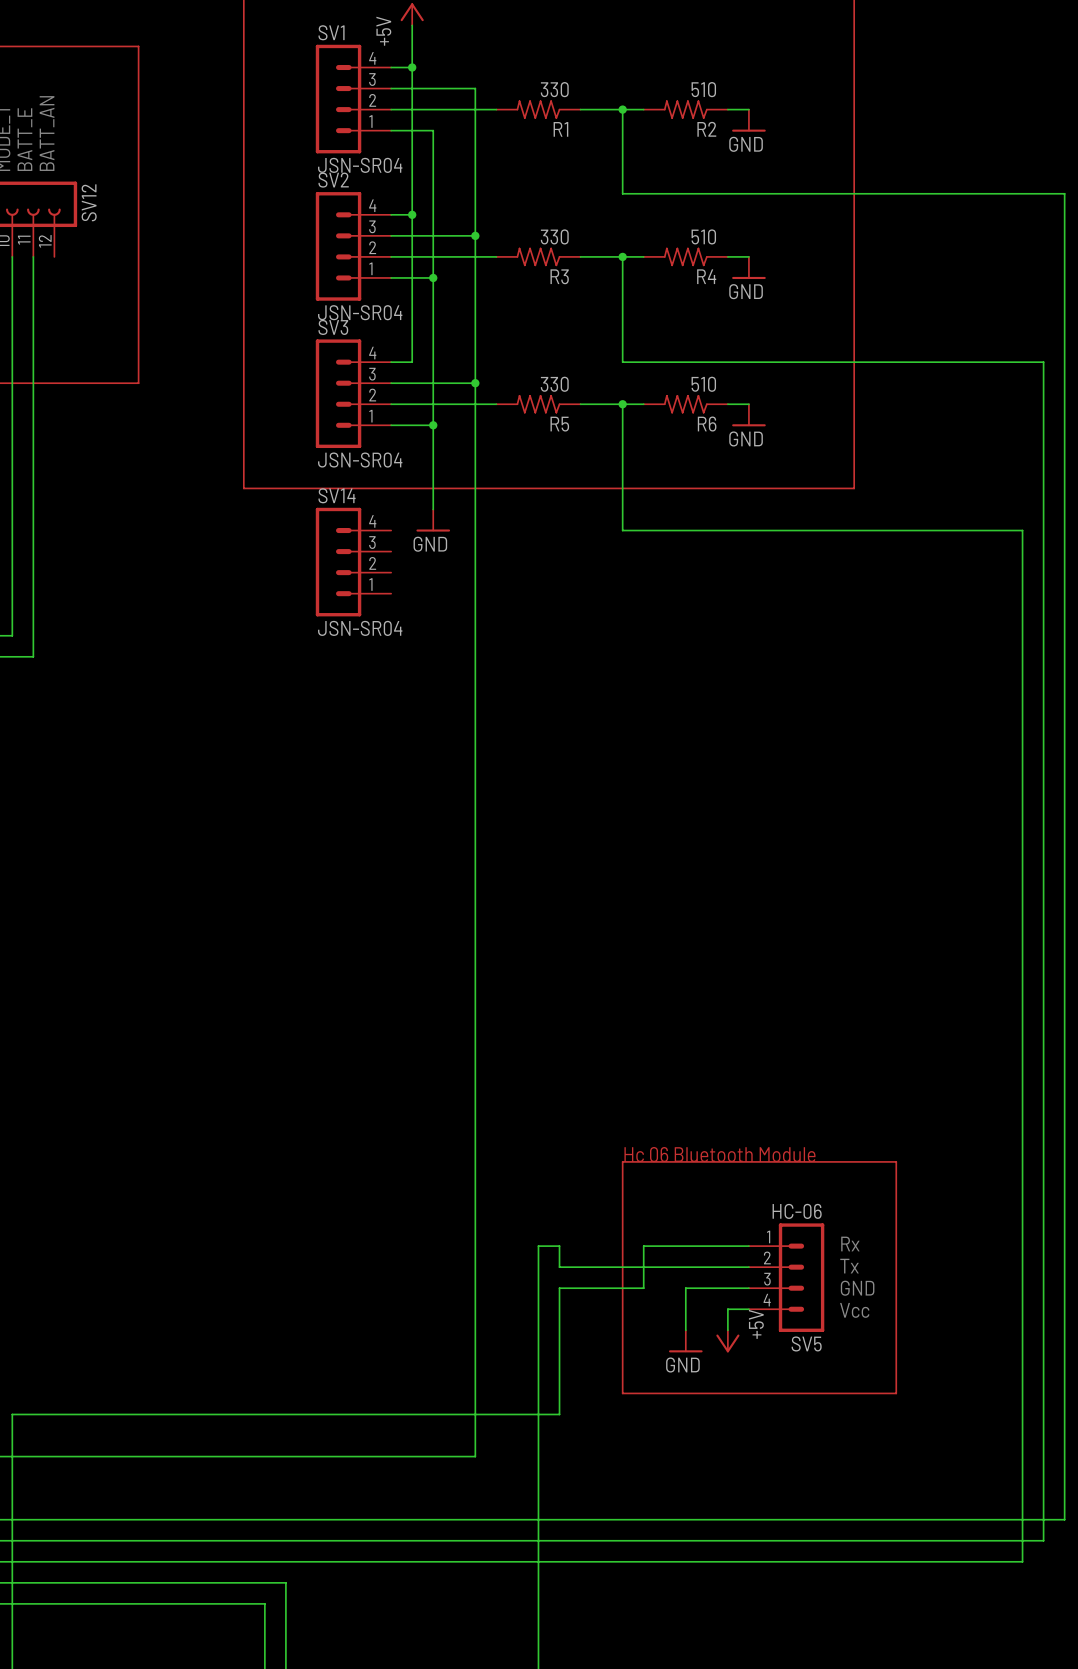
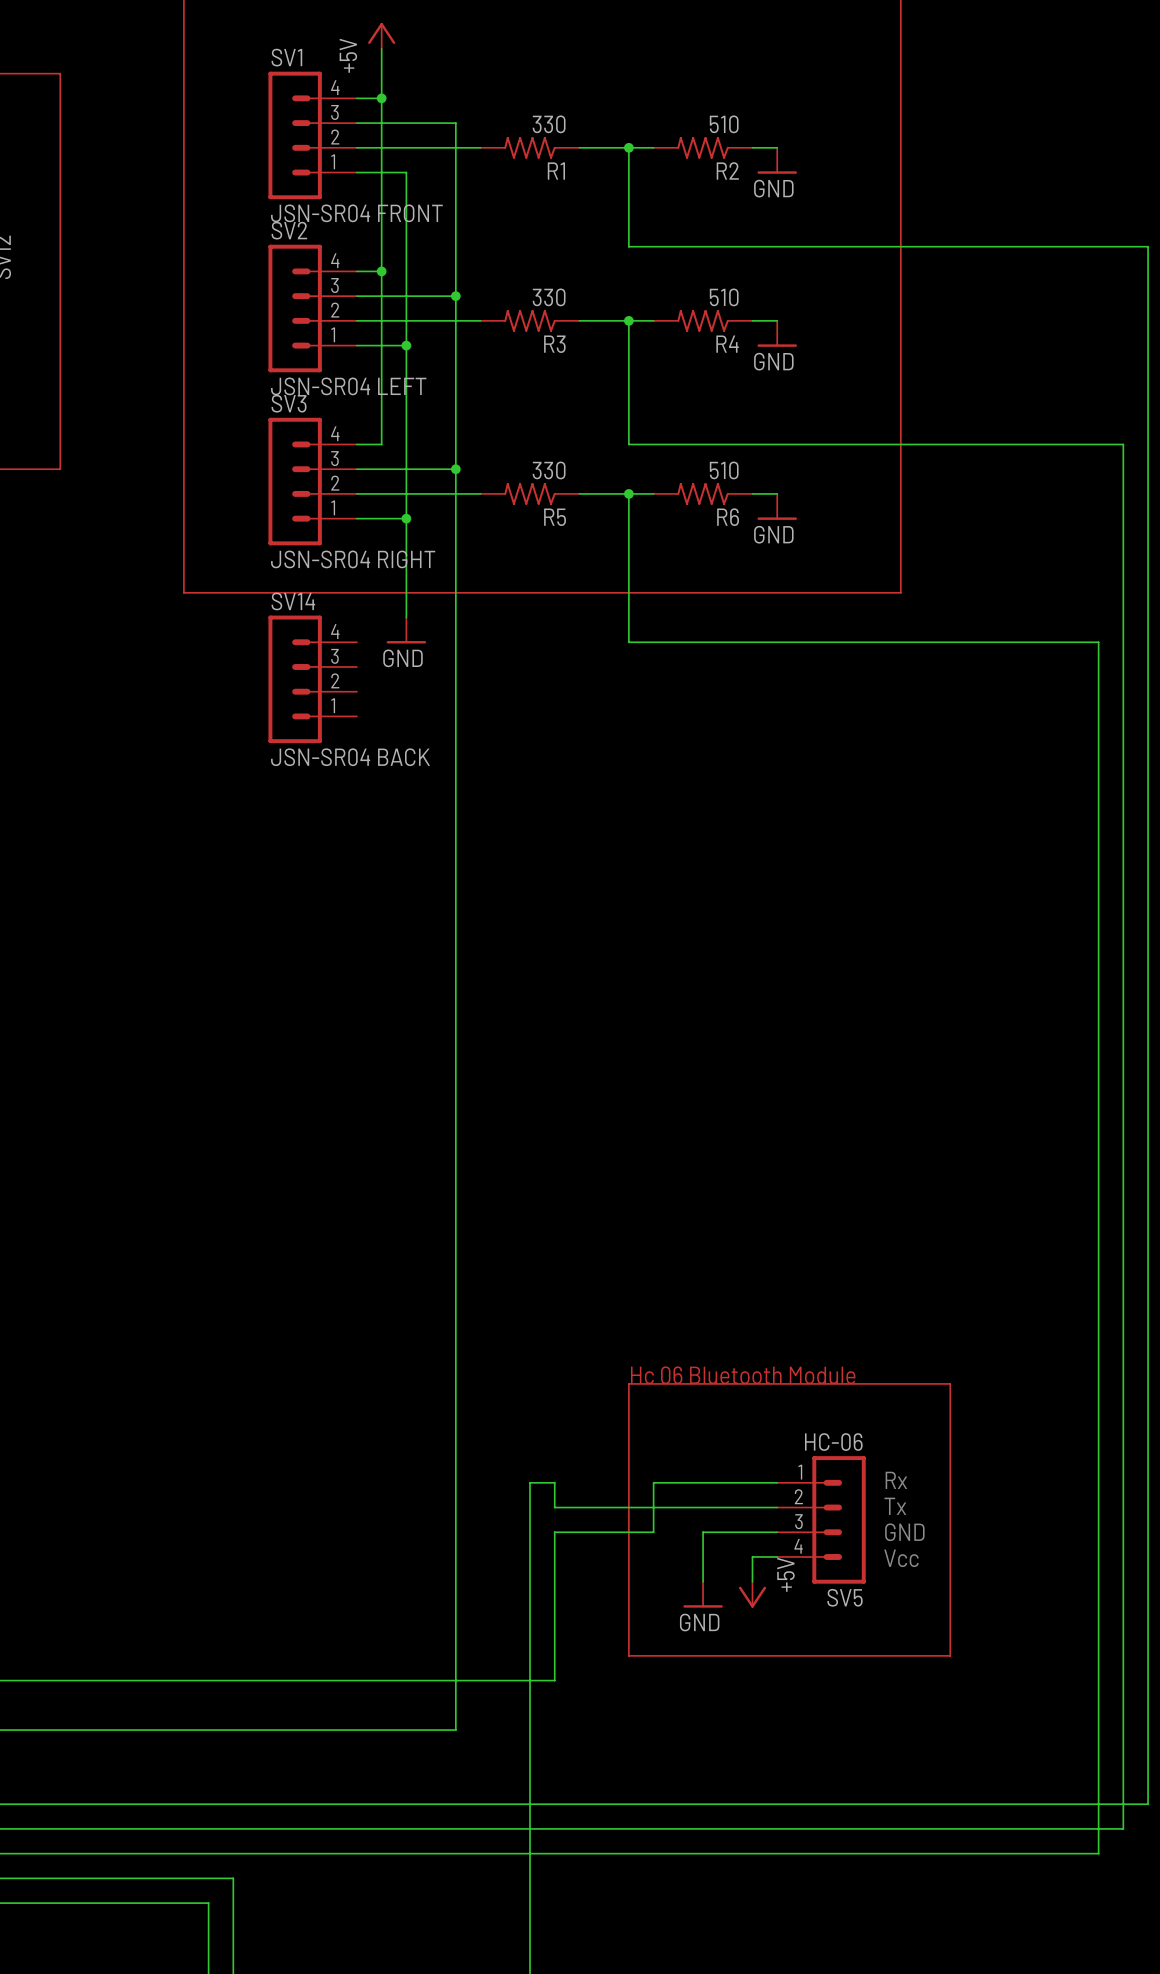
SV1 value: JSN-SR04 (360, 165) -> JSN-SR04 FRONT (356, 213)
SV2 value: JSN-SR04 (360, 312) -> JSN-SR04 LEFT (348, 386)
SV3 value: JSN-SR04 (360, 460) -> JSN-SR04 RIGHT (353, 559)
SV14 value: JSN-SR04 (360, 628) -> JSN-SR04 BACK (350, 757)

